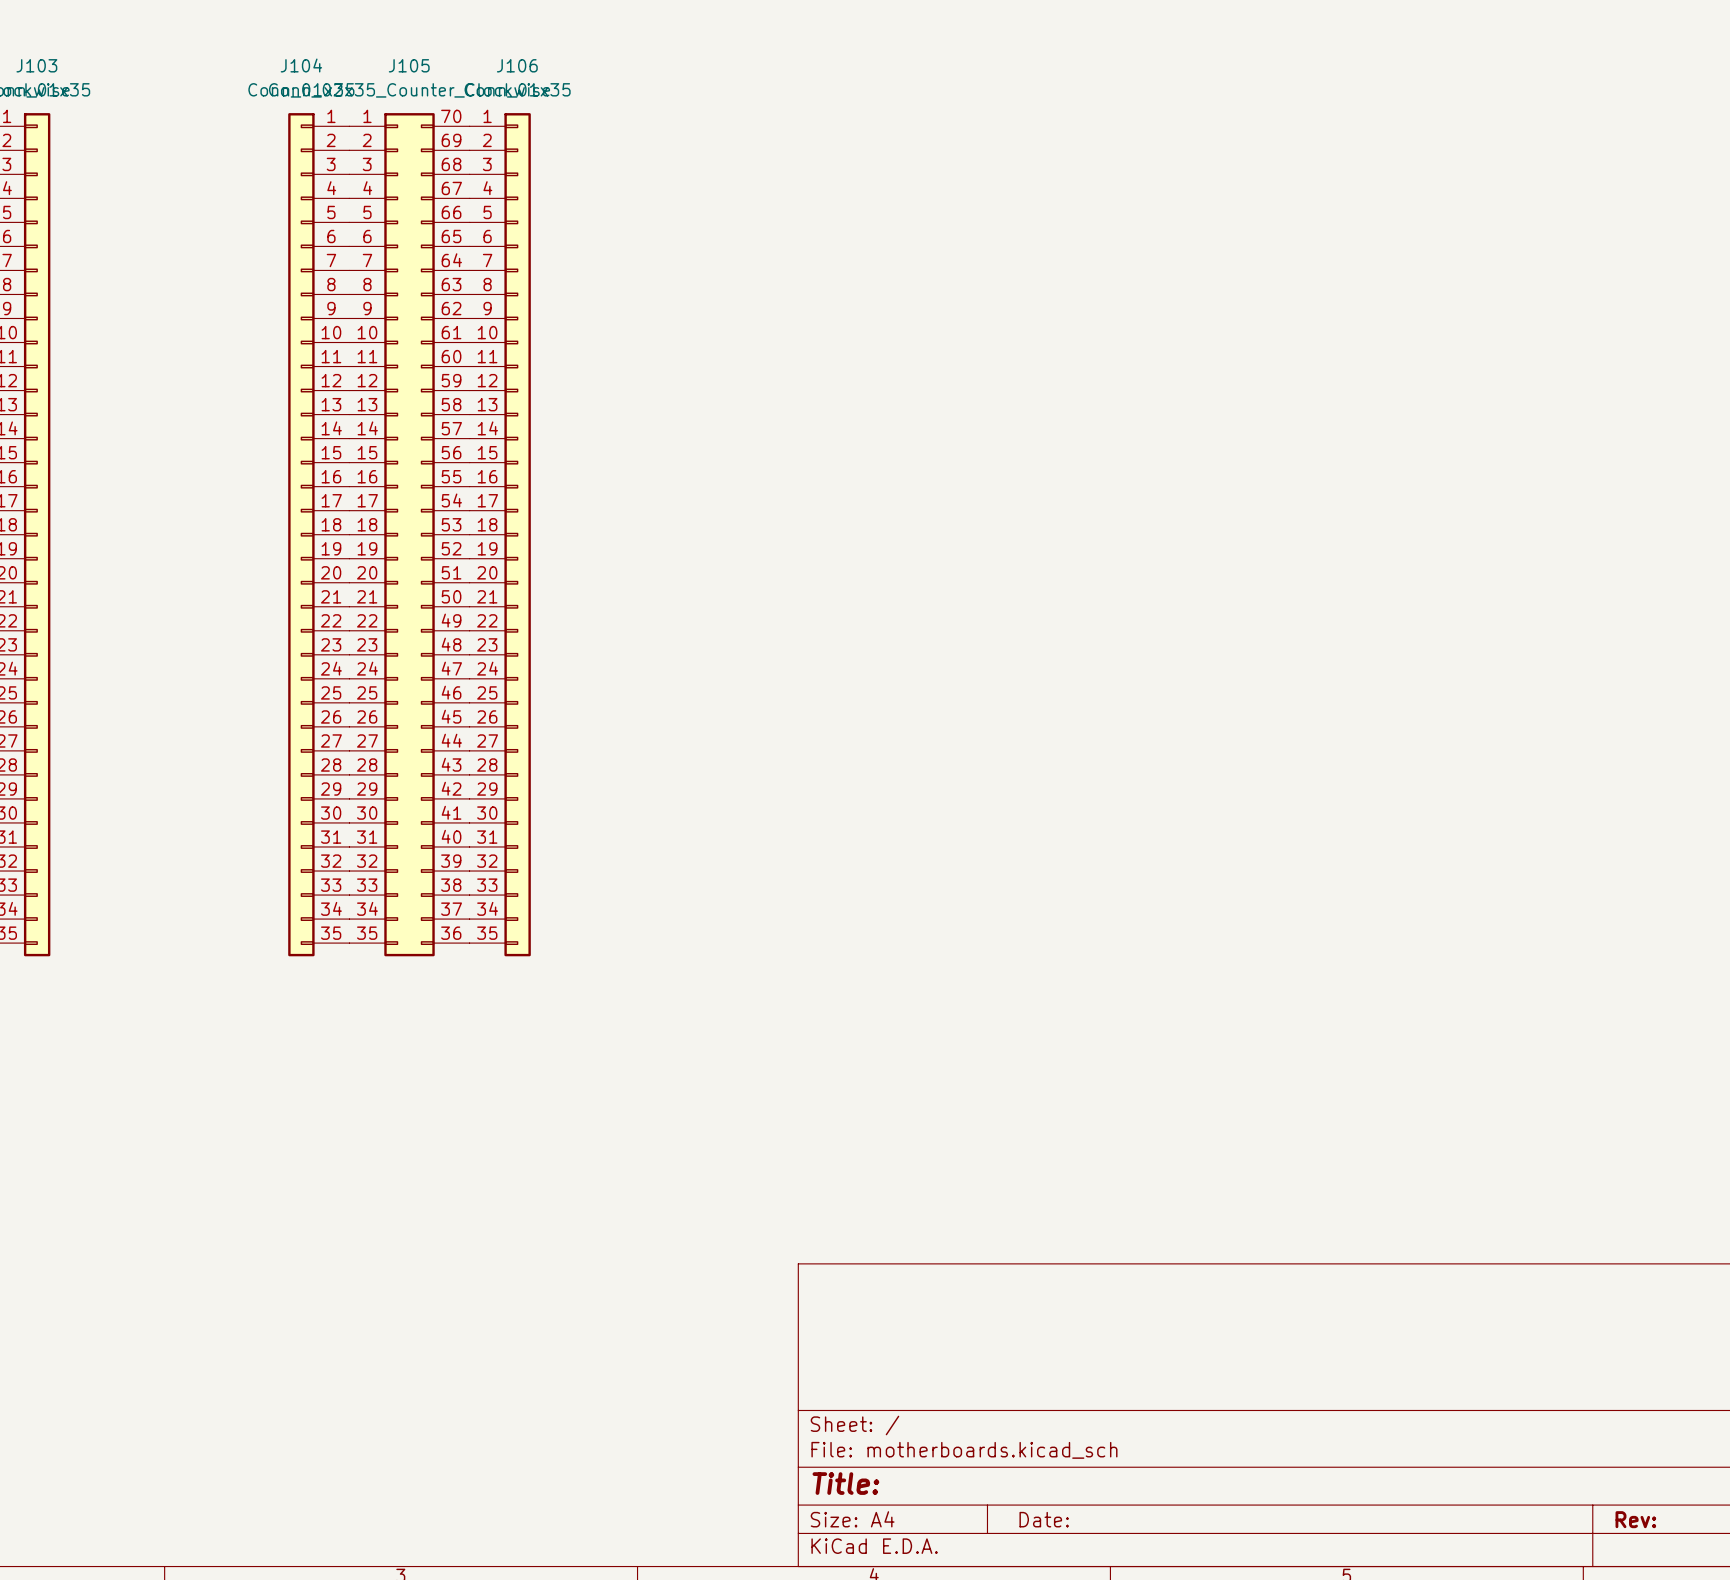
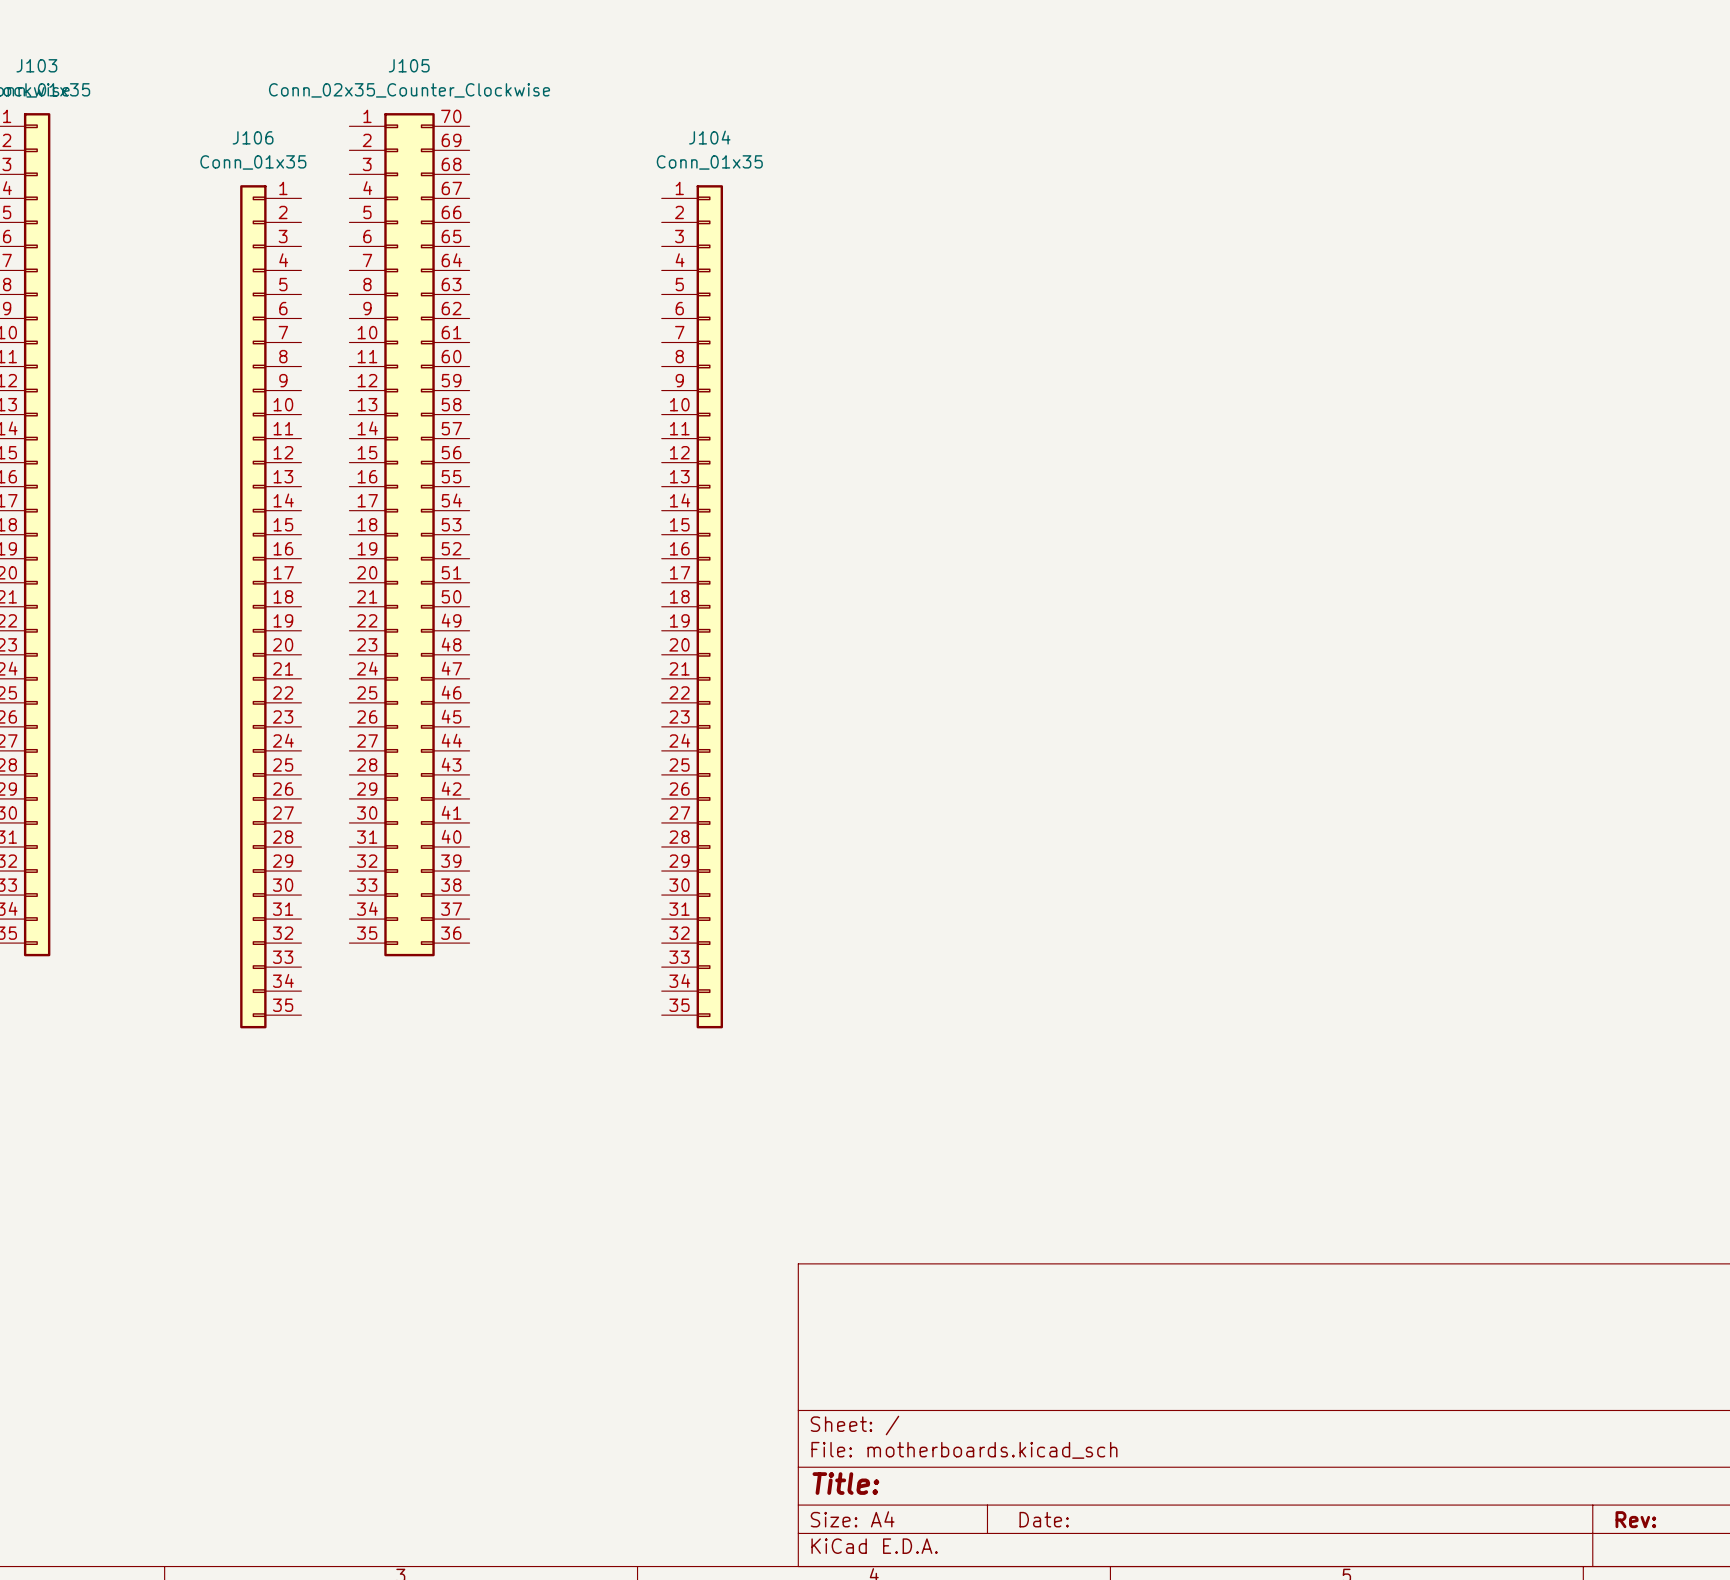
J104 flip: as is (301, 534) -> left-right (709, 606)
J106 flip: as is (517, 534) -> left-right (253, 606)

